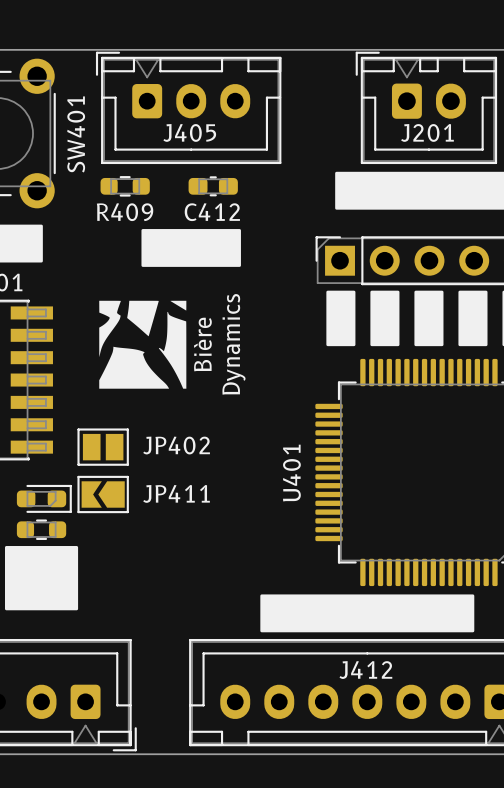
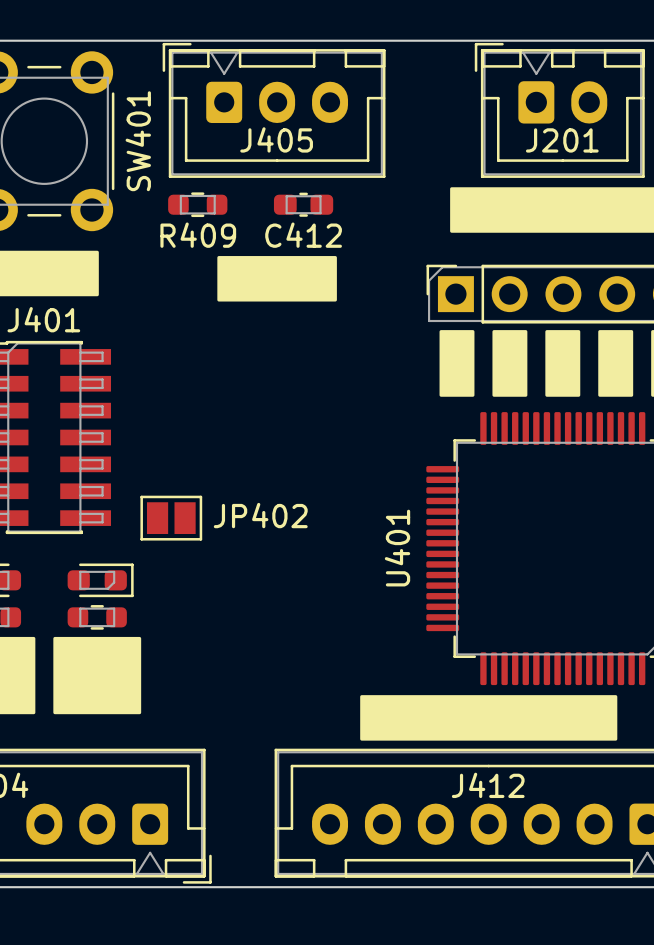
drawing: [99, 300, 187, 389] -> none
text: Bière (202, 344) -> none
text: Dynamics (233, 344) -> none
JP411: (103, 494) -> none

